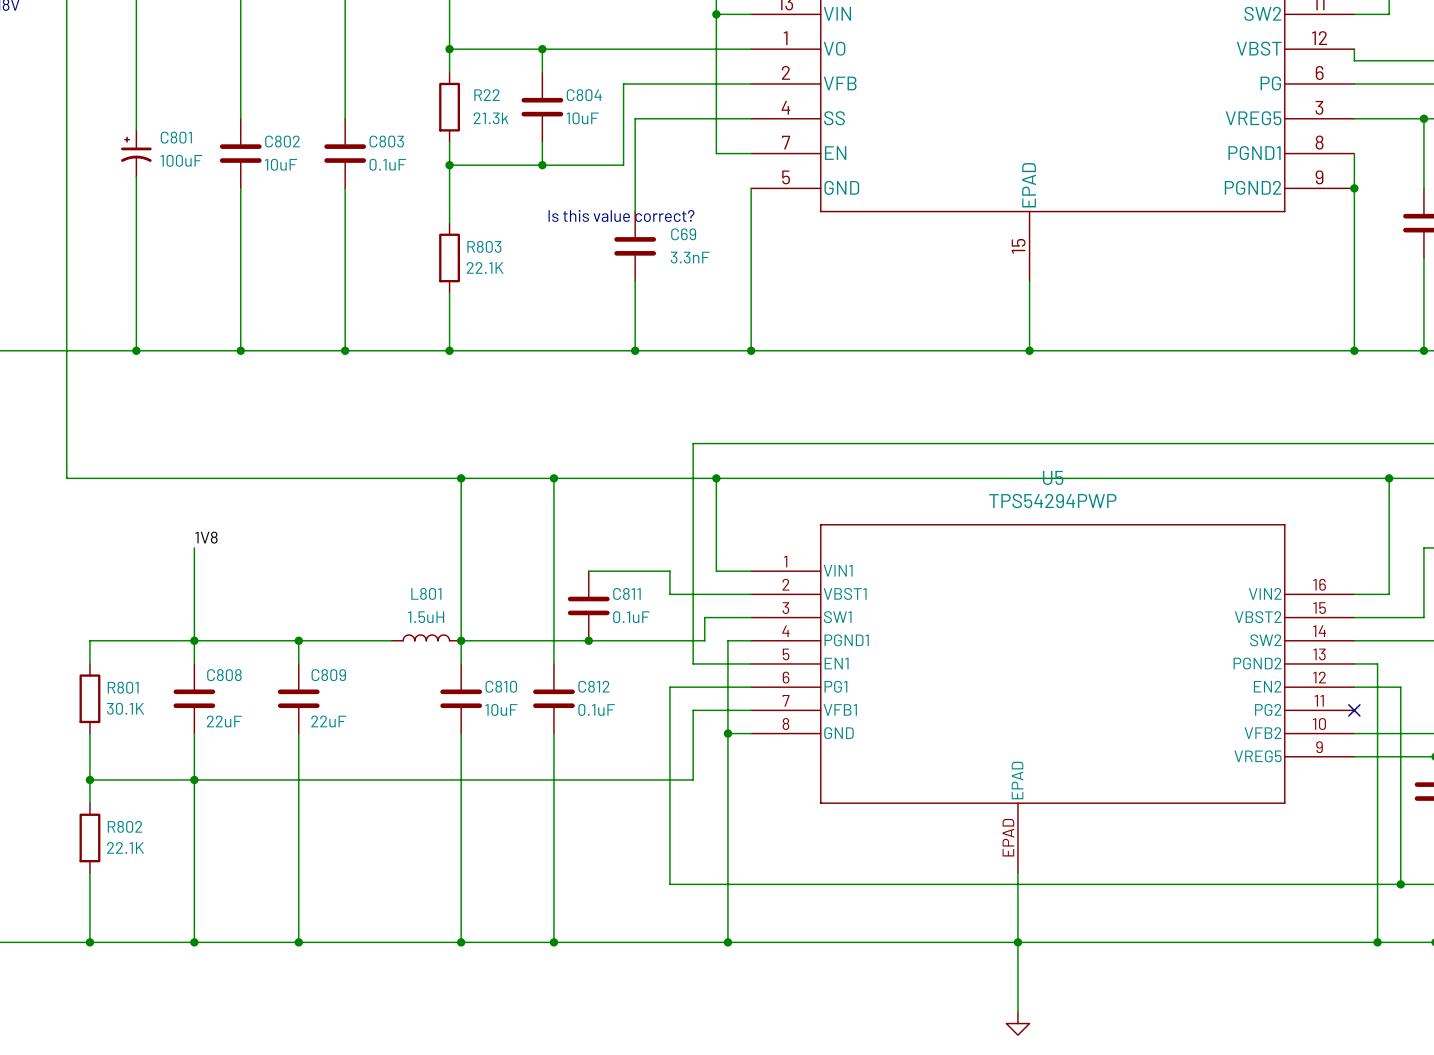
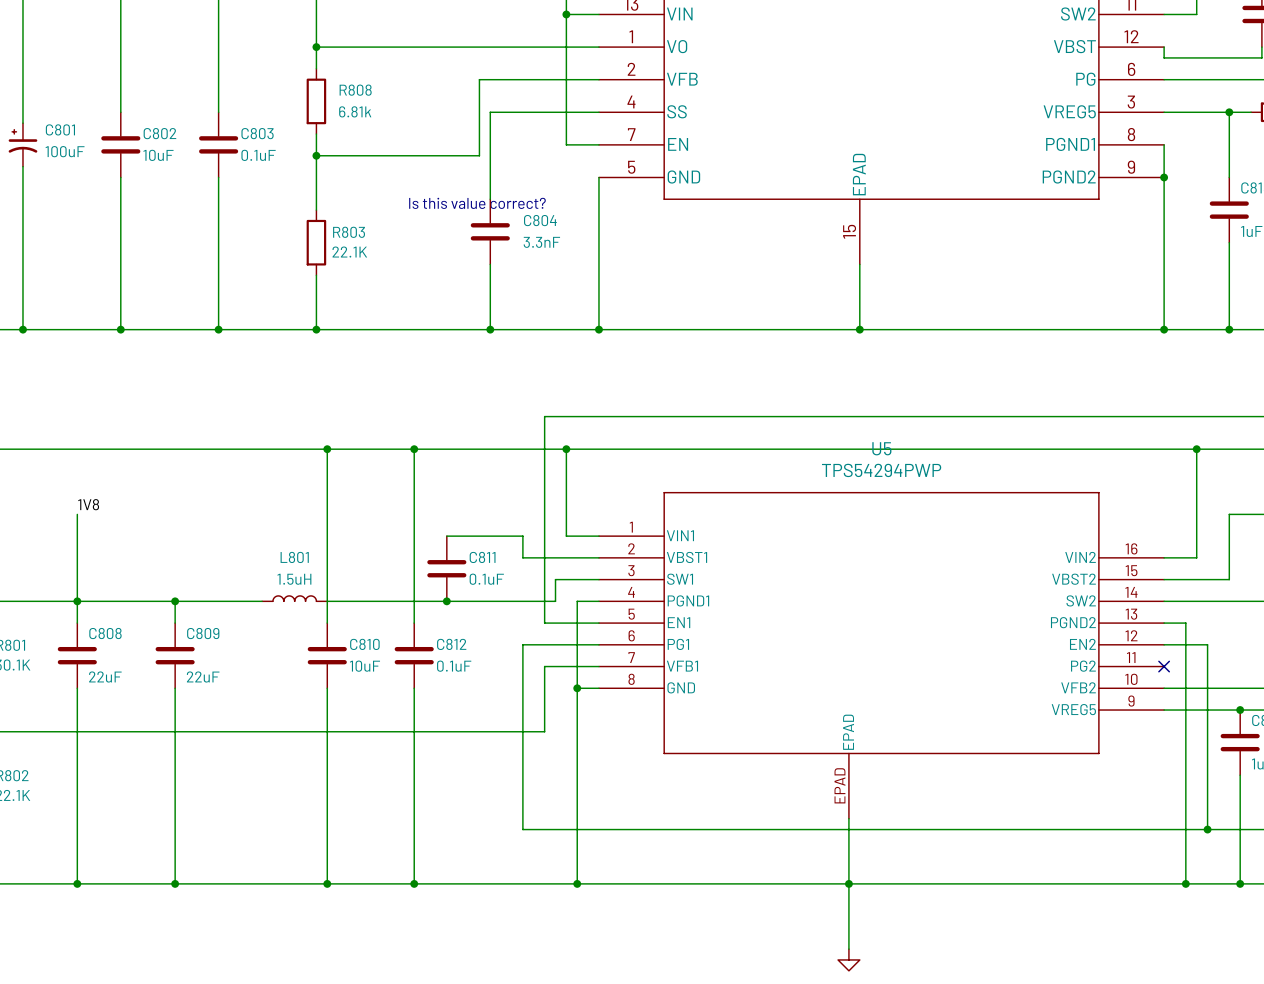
wire: (542, 49) (542, 72) -> none
junction: (542, 49) -> none
R22 name: R22 (487, 95) -> R808 (355, 90)
C804: 10uF (542, 107) -> none
R22 value: 21.3k (491, 118) -> 6.81k (355, 111)
wire: (542, 141) (542, 165) -> none
junction: (542, 165) -> none
C69 name: C69 (683, 234) -> C804 (540, 220)
junction: (461, 640) -> none
junction: (194, 779) -> none

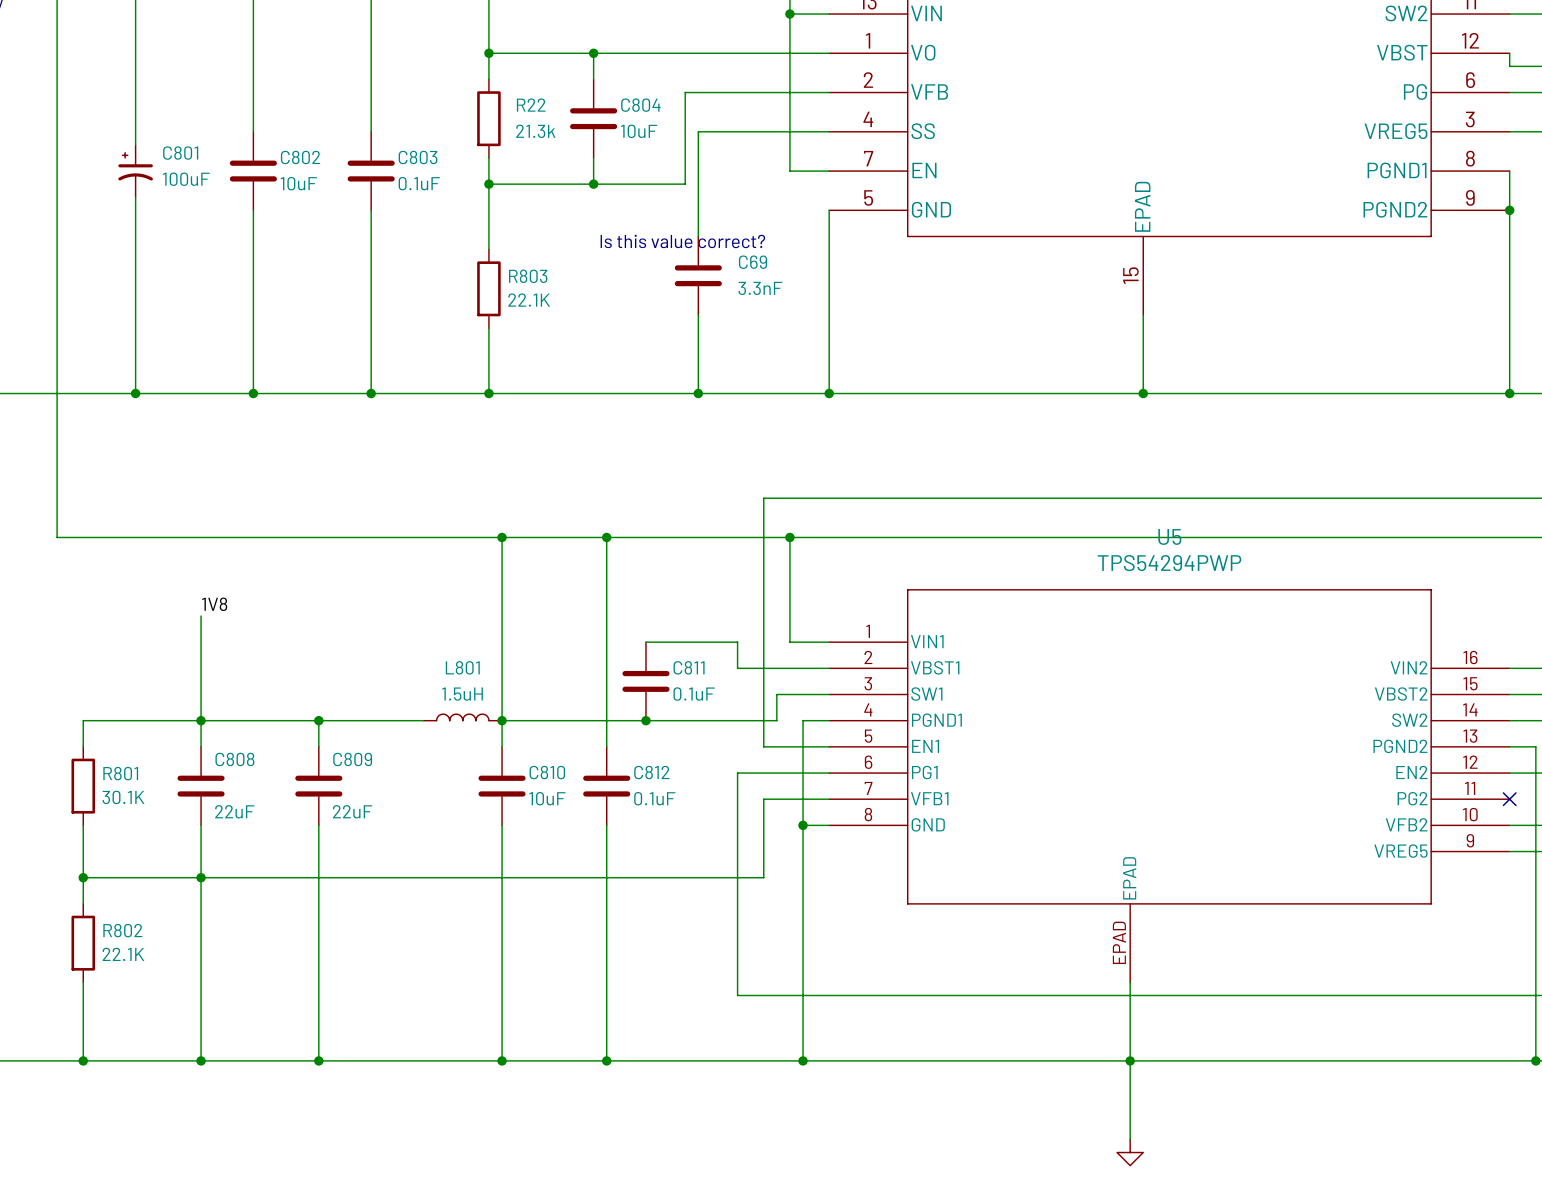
wire: none -> (593, 53) (593, 79)
junction: none -> (593, 53)
R808 name: R808 (355, 90) -> R22 (531, 105)
C804: none -> 10uF (593, 118)
R808 value: 6.81k (355, 111) -> 21.3k (535, 131)
wire: none -> (593, 157) (593, 184)
junction: none -> (593, 184)
C804 name: C804 (540, 220) -> C69 (753, 262)
junction: none -> (502, 720)
junction: none -> (201, 877)

